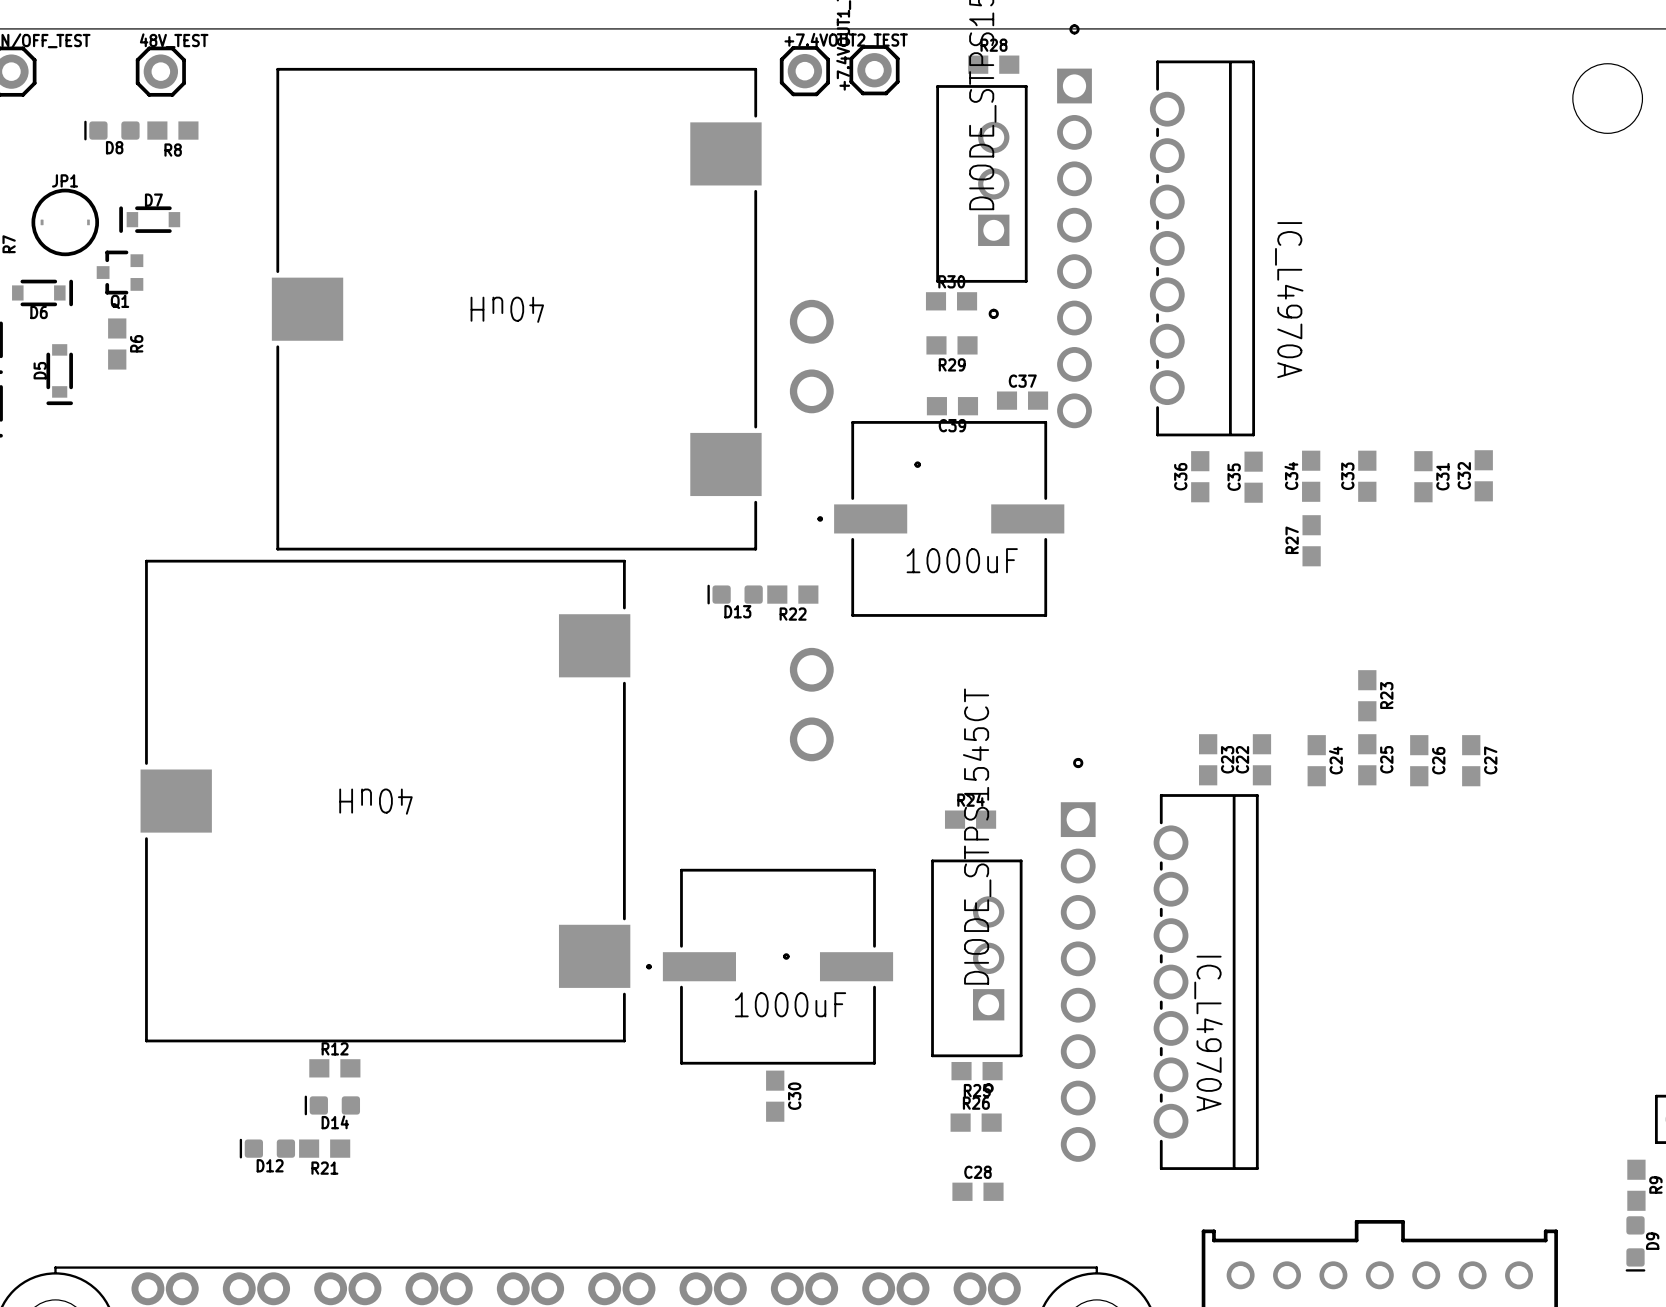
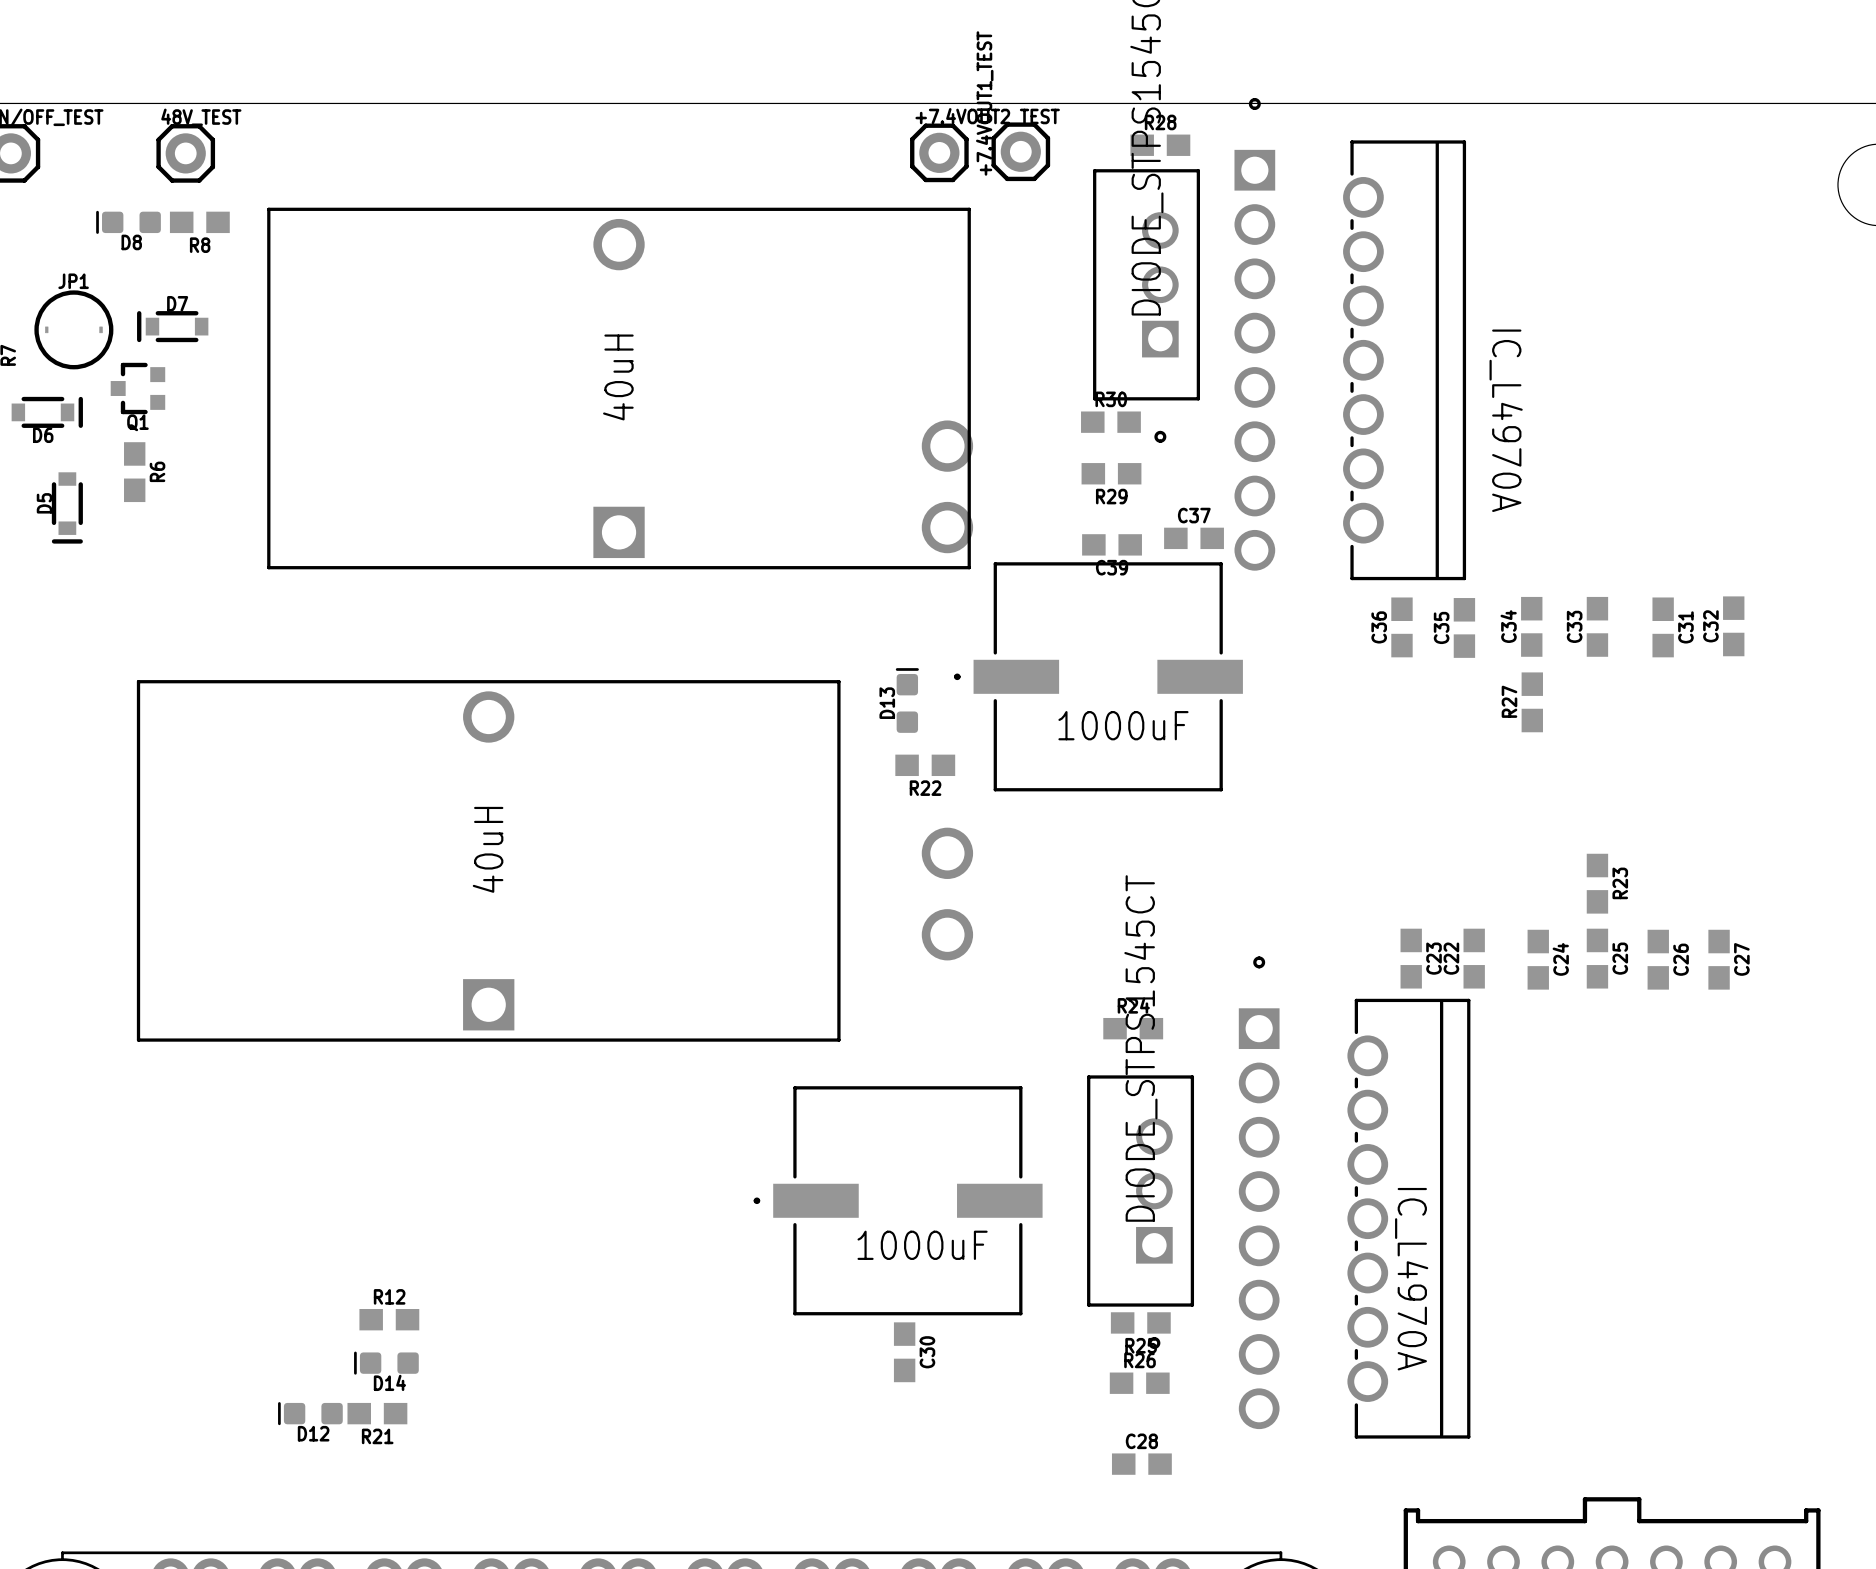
part: none -> 40uH (619, 388)
part: 40uH (596, 309) -> none
D13 rotation: 0° (735, 594) -> 90° clockwise (907, 700)
D13 position: (735, 594) -> (907, 700)
part: none -> 40uH (488, 860)
part: 40uH (465, 801) -> none

